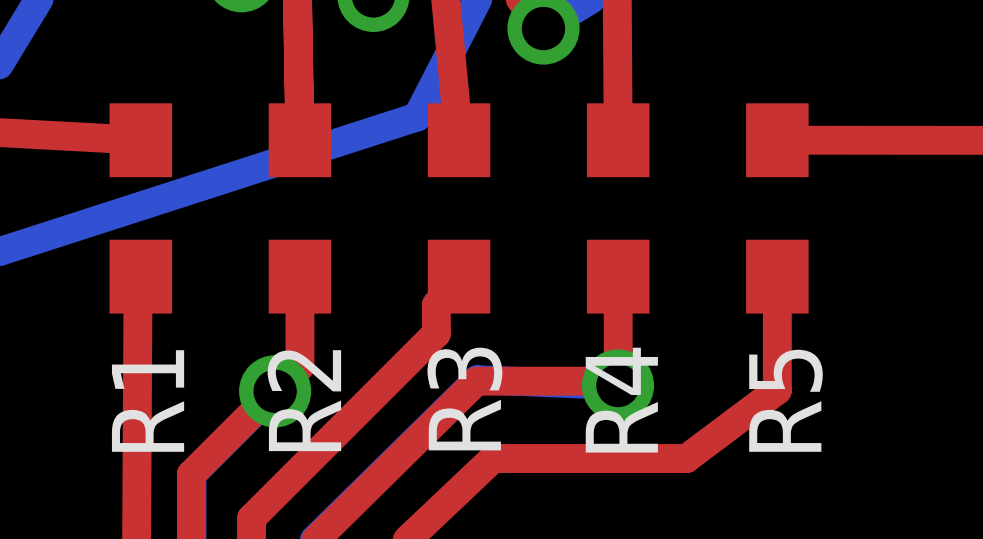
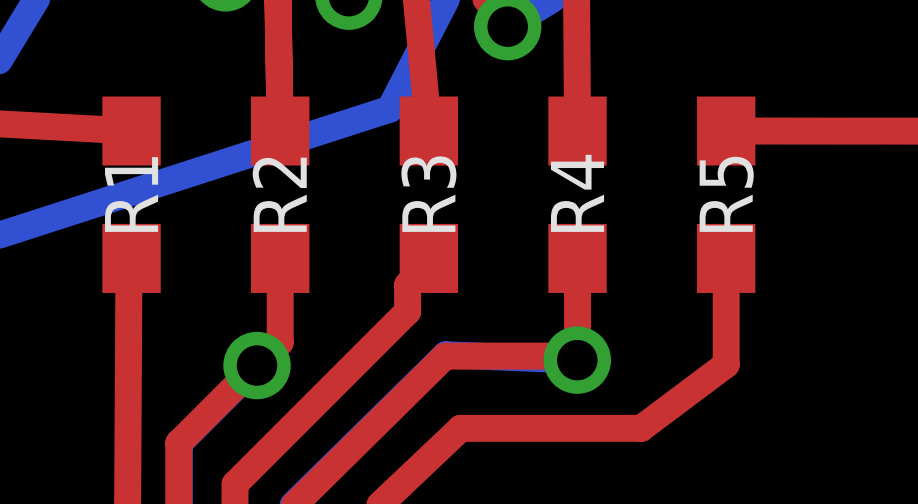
R3 name position: R3 (464, 399) -> R3 (428, 194)
R2 name position: R2 (304, 400) -> R2 (279, 194)
R4 name position: R4 (621, 400) -> R4 (577, 193)
R5 name position: R5 (785, 400) -> R5 (726, 194)
R1 name position: R1 (148, 401) -> R1 (131, 194)

